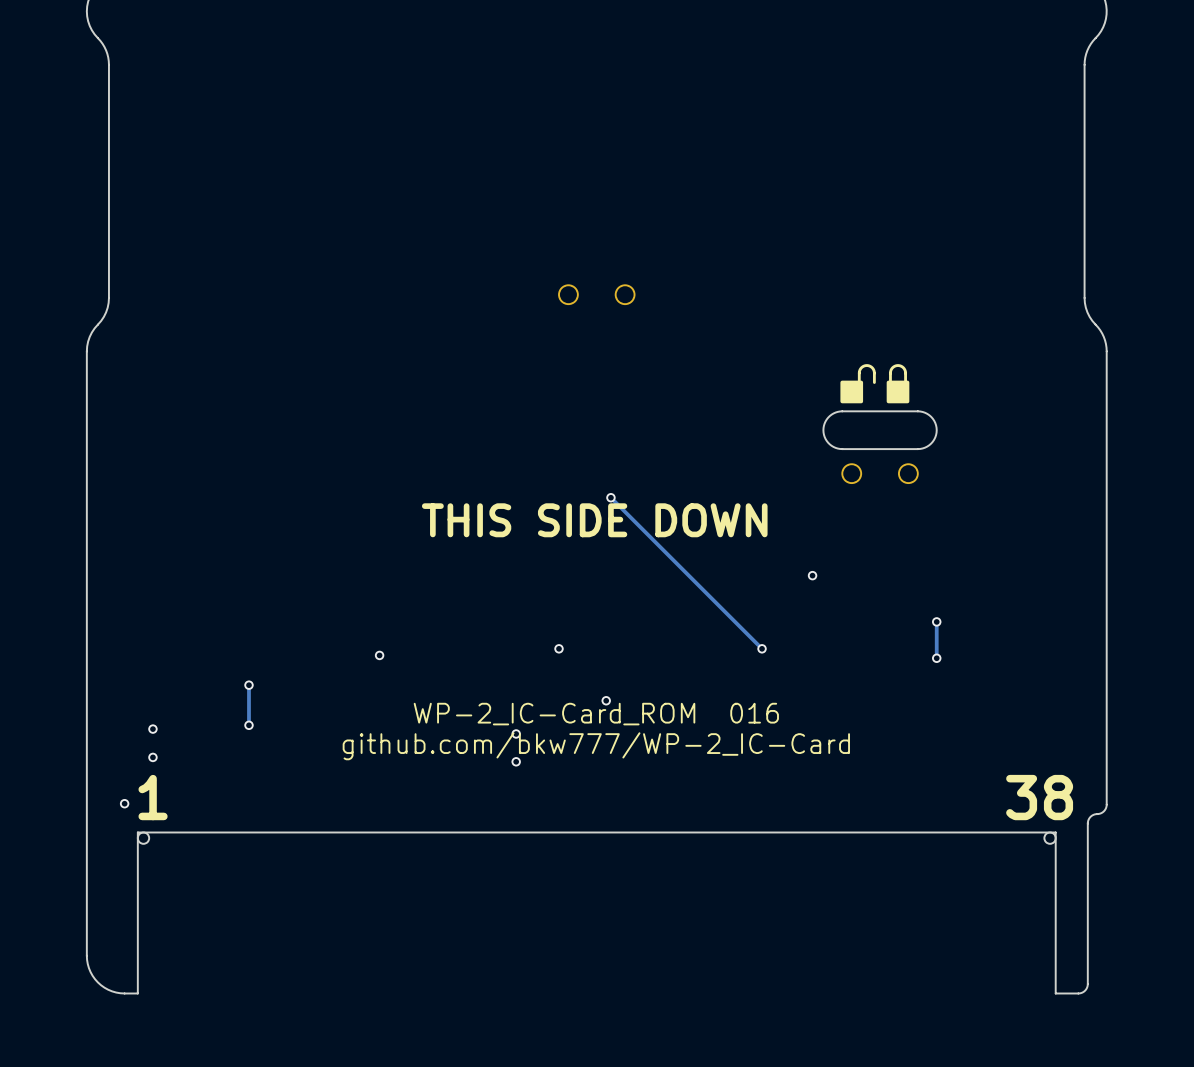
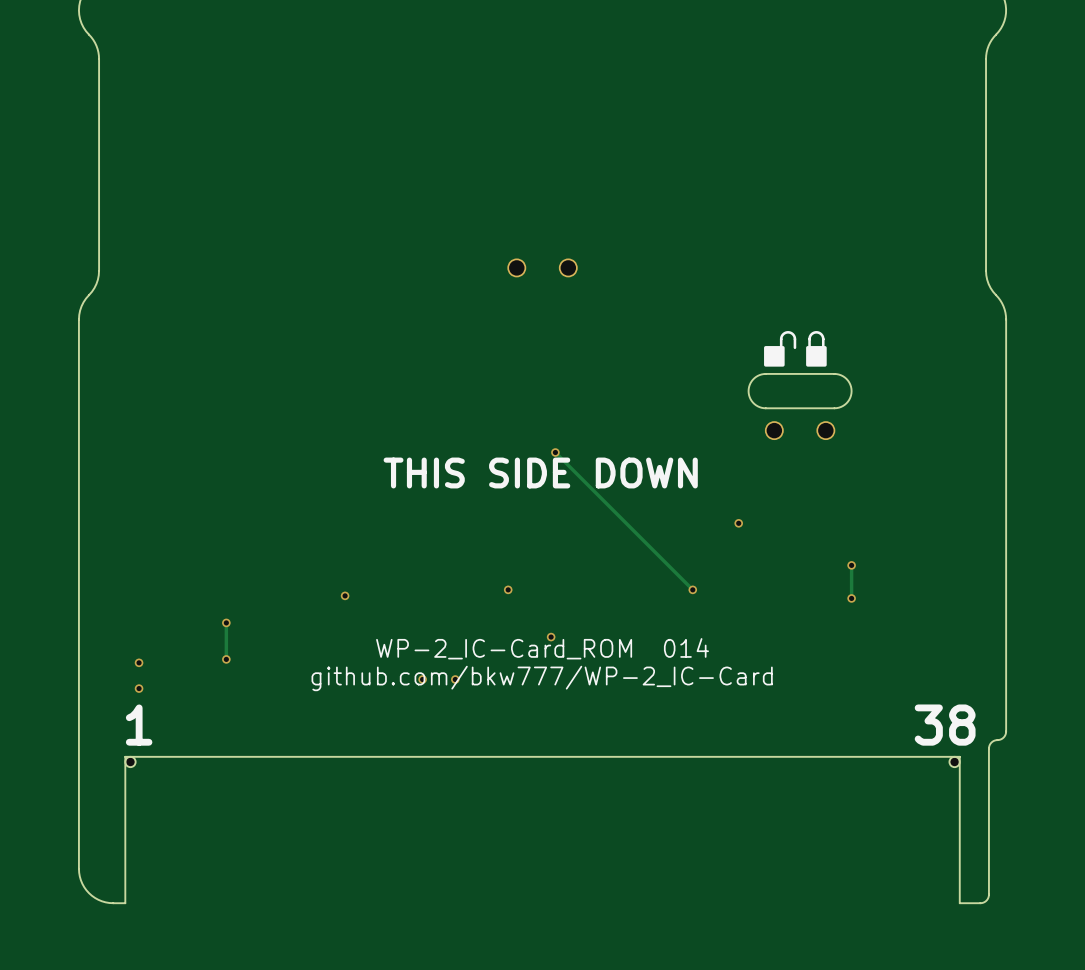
text: WP-2_IC-Card_ROM 016 (596, 714) -> WP-2_IC-Card_ROM 014 (542, 648)
via: (516, 733) -> none
via: none -> (422, 679)
via: none -> (455, 679)
via: (516, 761) -> none
via: (124, 803) -> none

